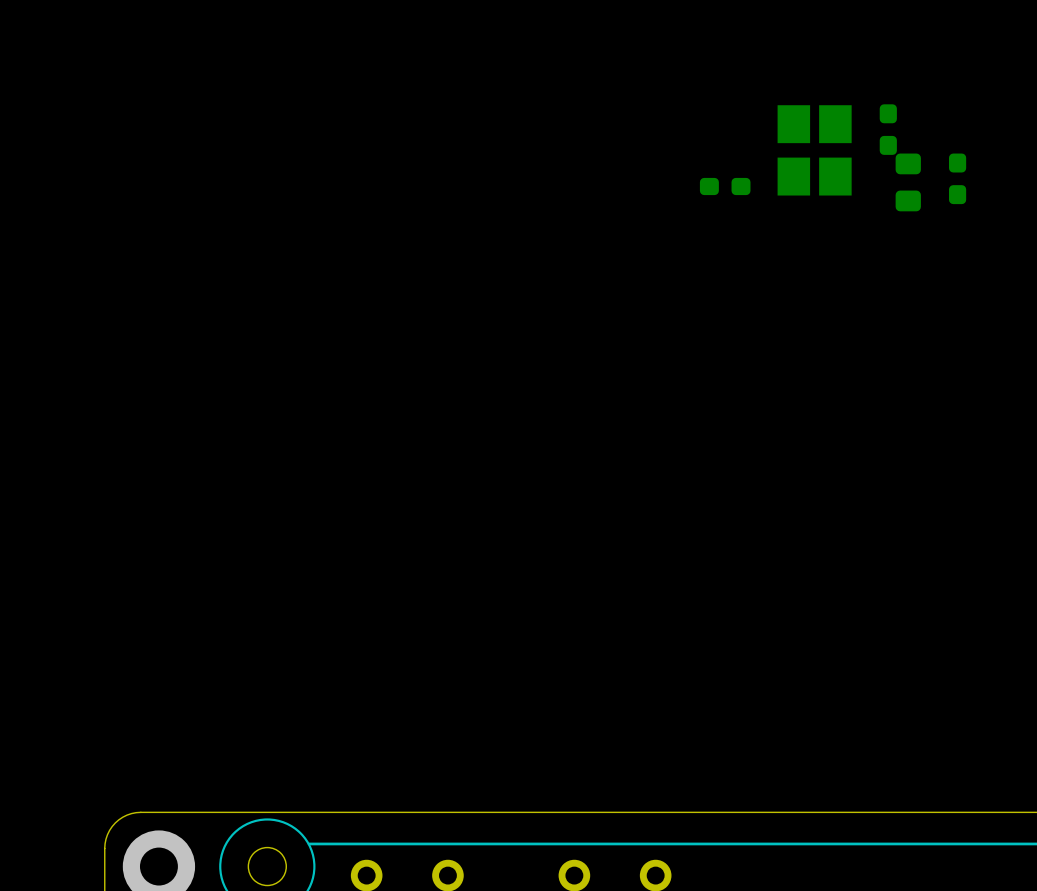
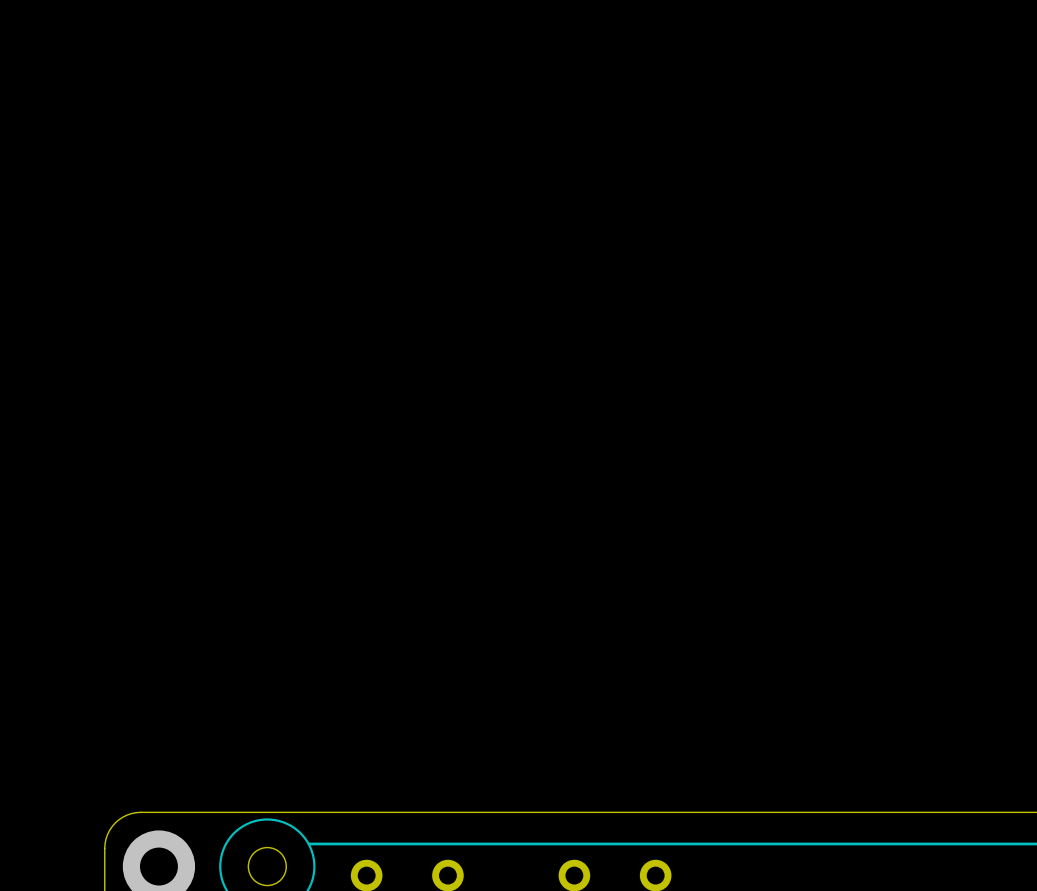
part: (888, 129) -> none
part: (814, 150) -> none
part: (957, 178) -> none
part: (908, 182) -> none
part: (725, 186) -> none

